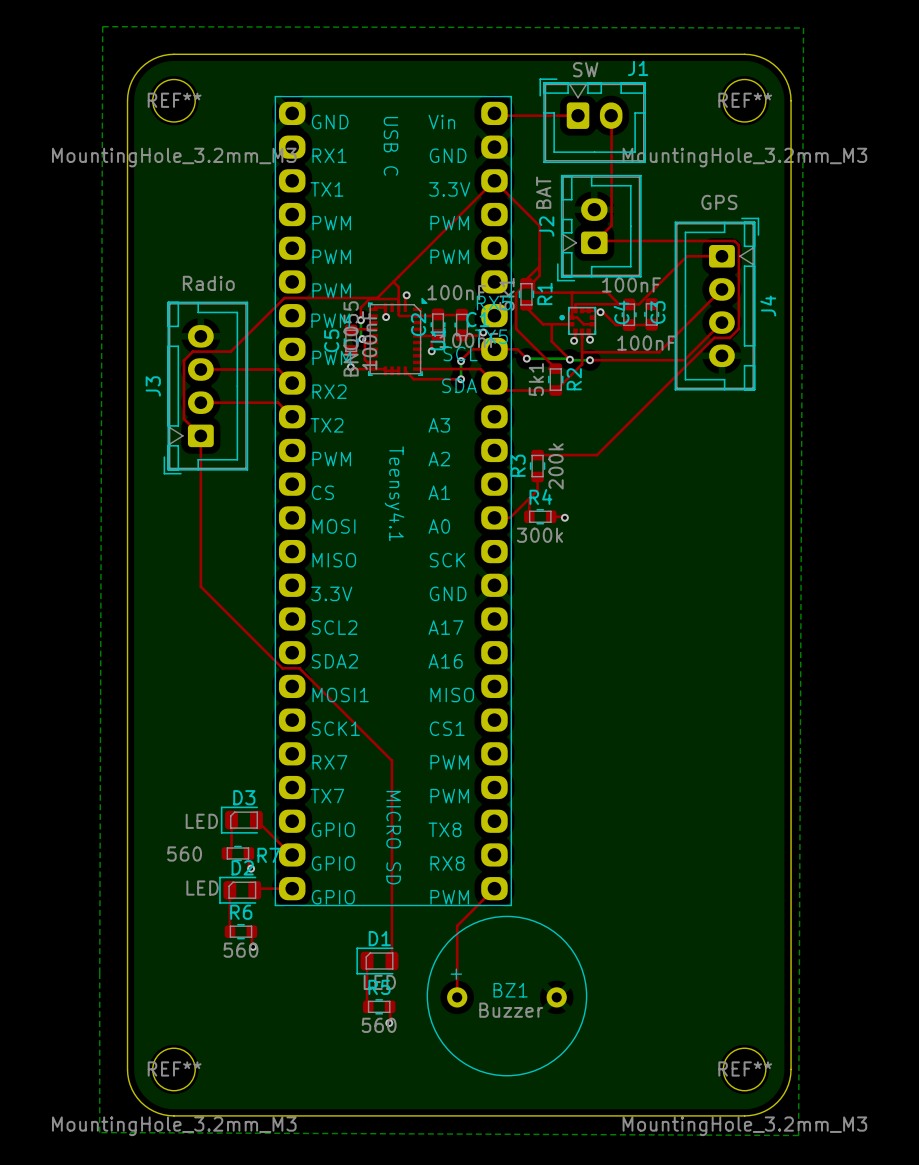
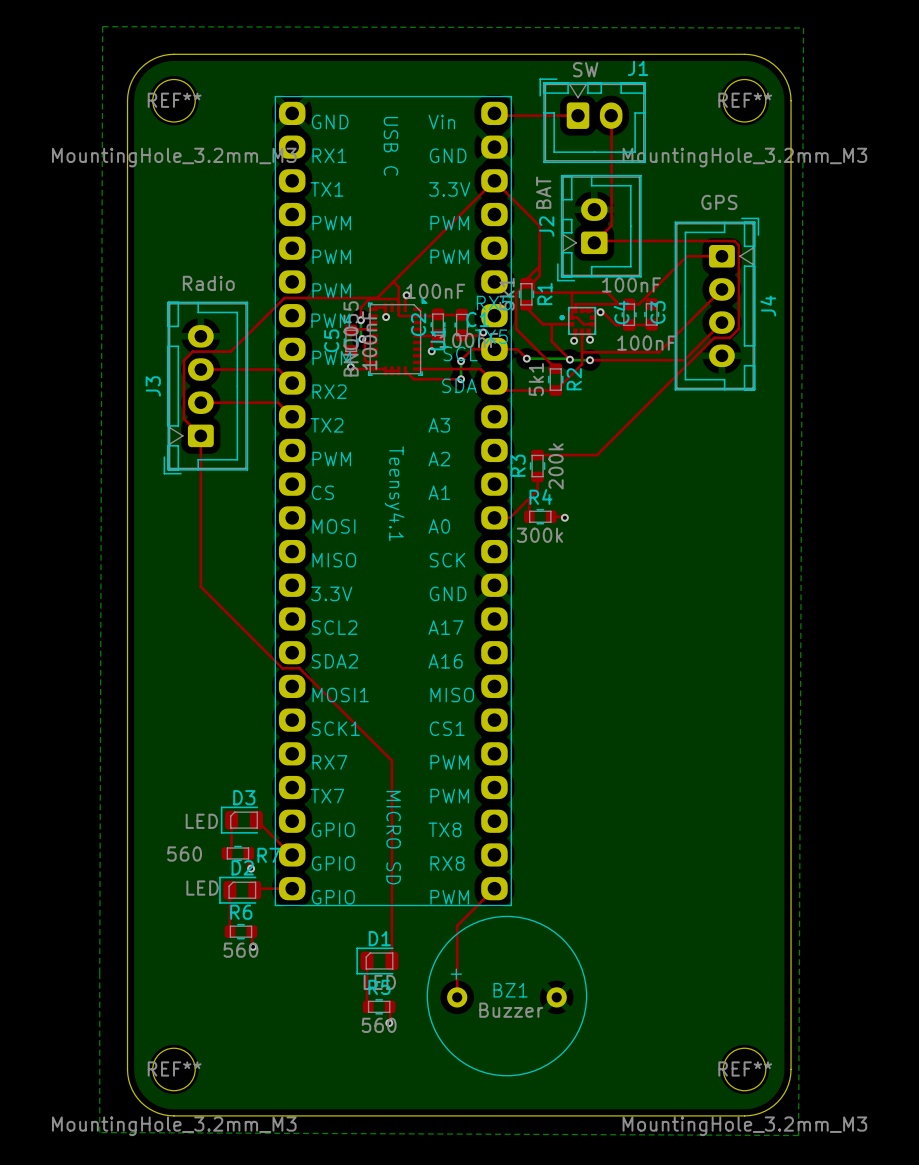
C2 value position: 100nF (456, 292) -> 100nF (435, 291)

